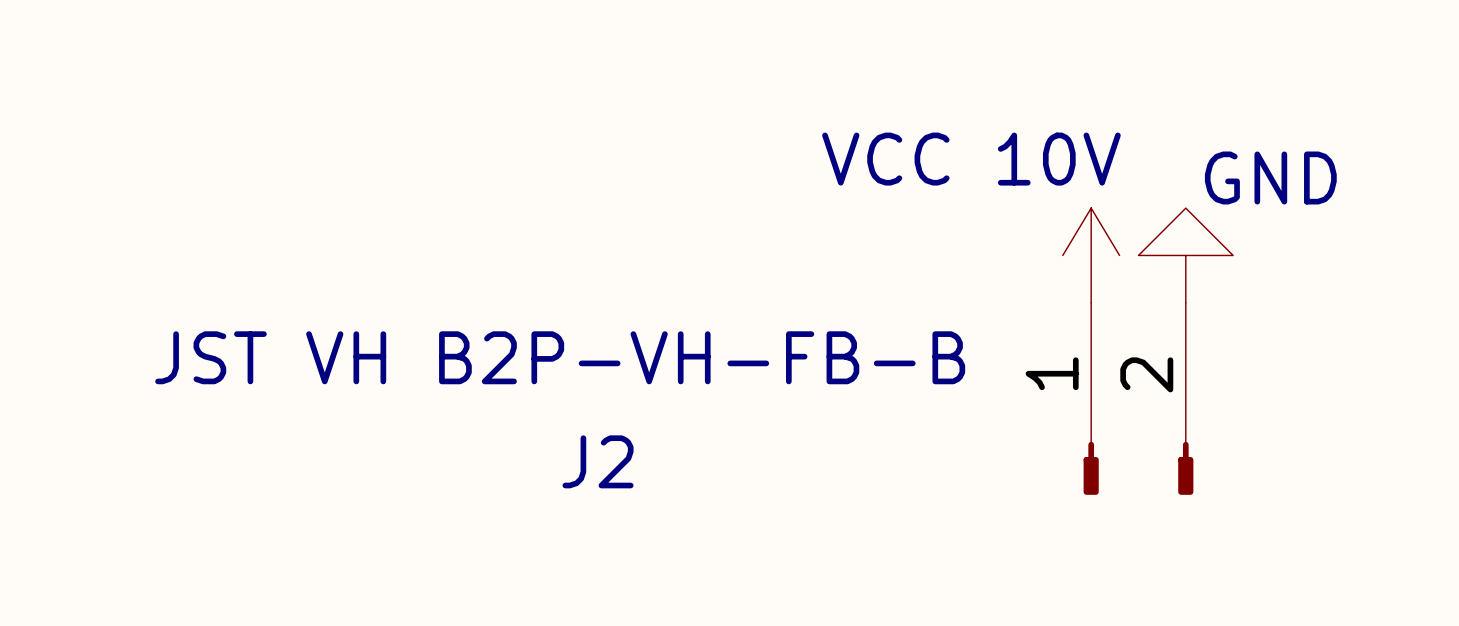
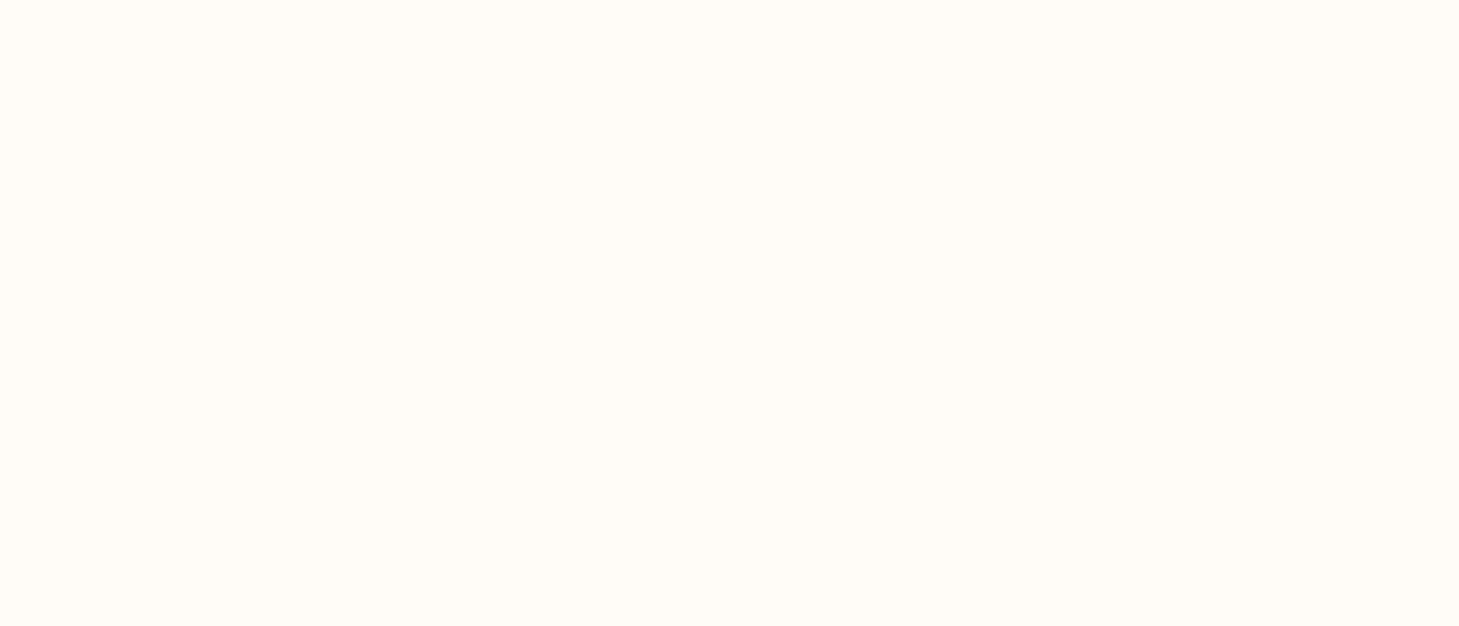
power symbol: VCC 10V (1091, 255) -> none
power symbol: GND (1185, 255) -> none
J2: JST VH B2P-VH-FB-B (1138, 398) -> none

